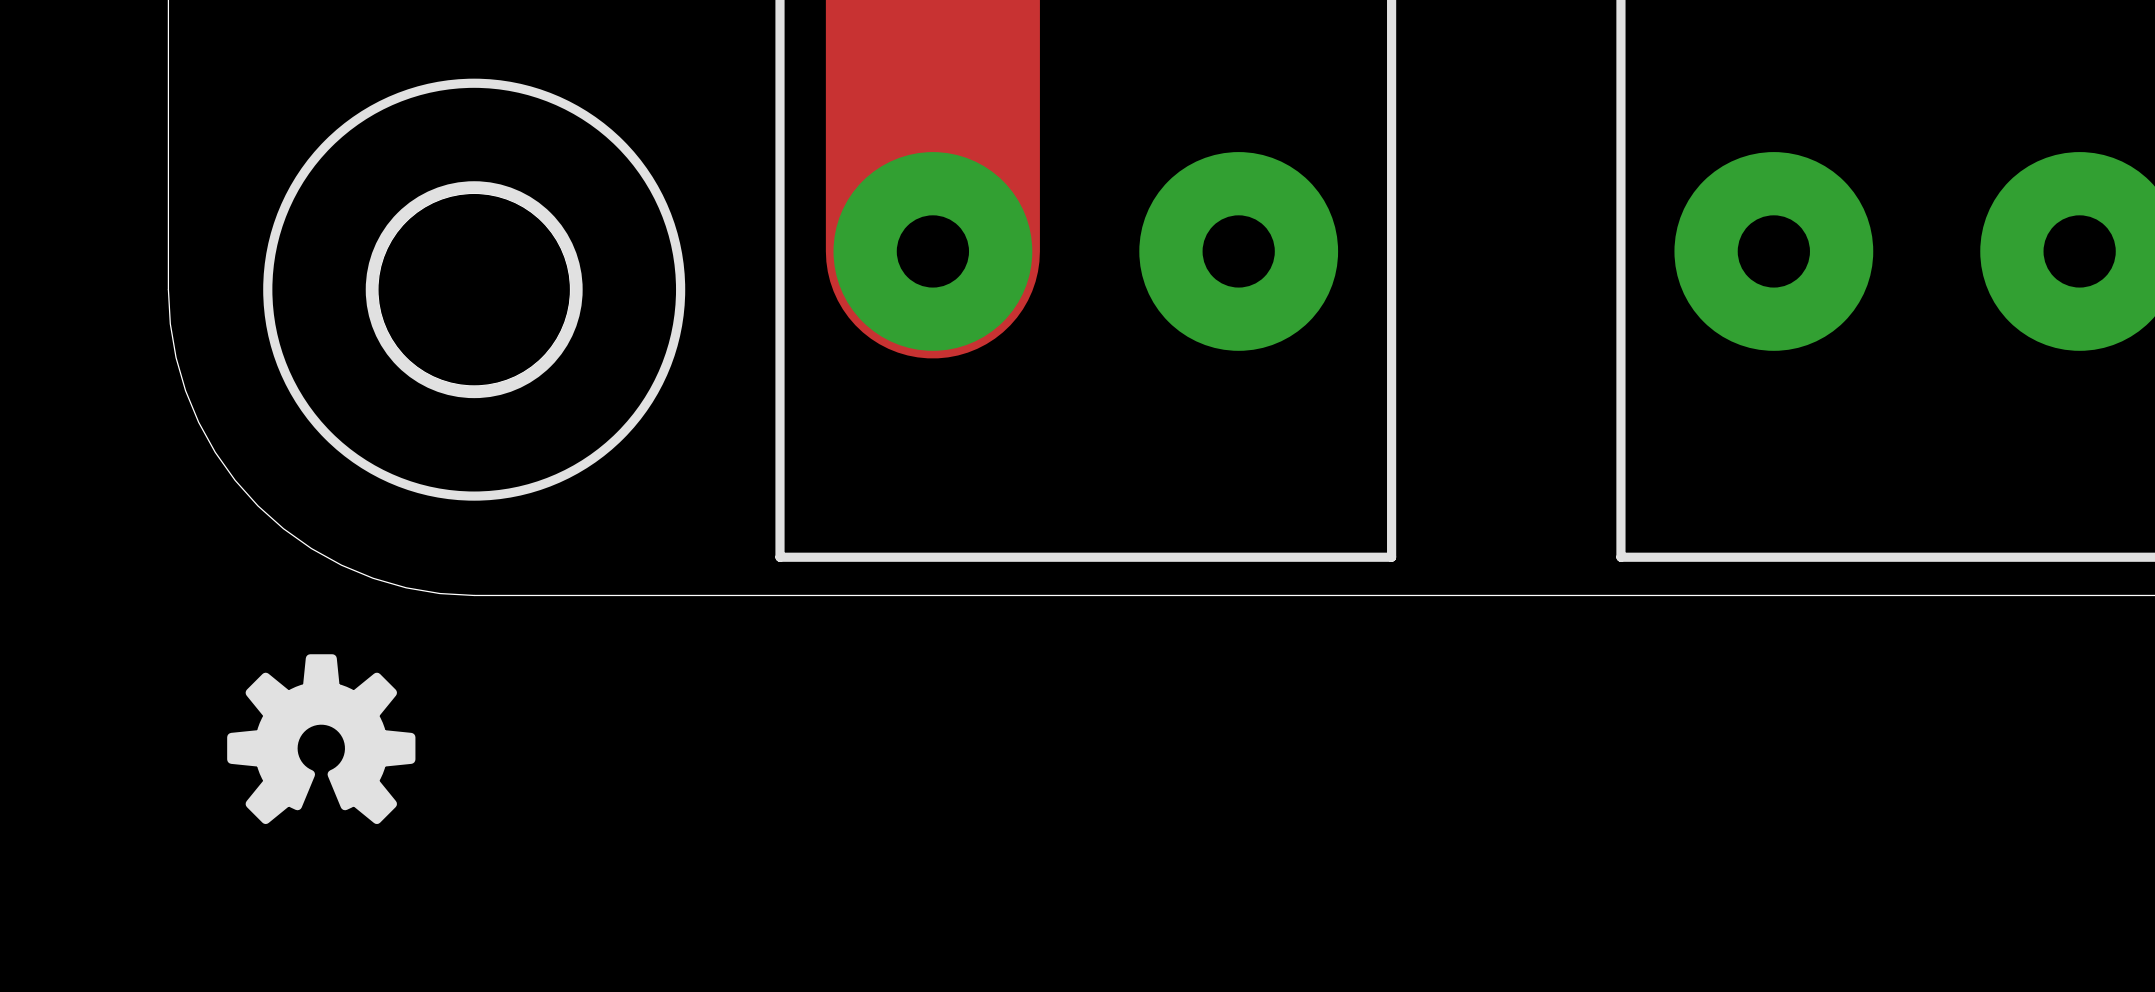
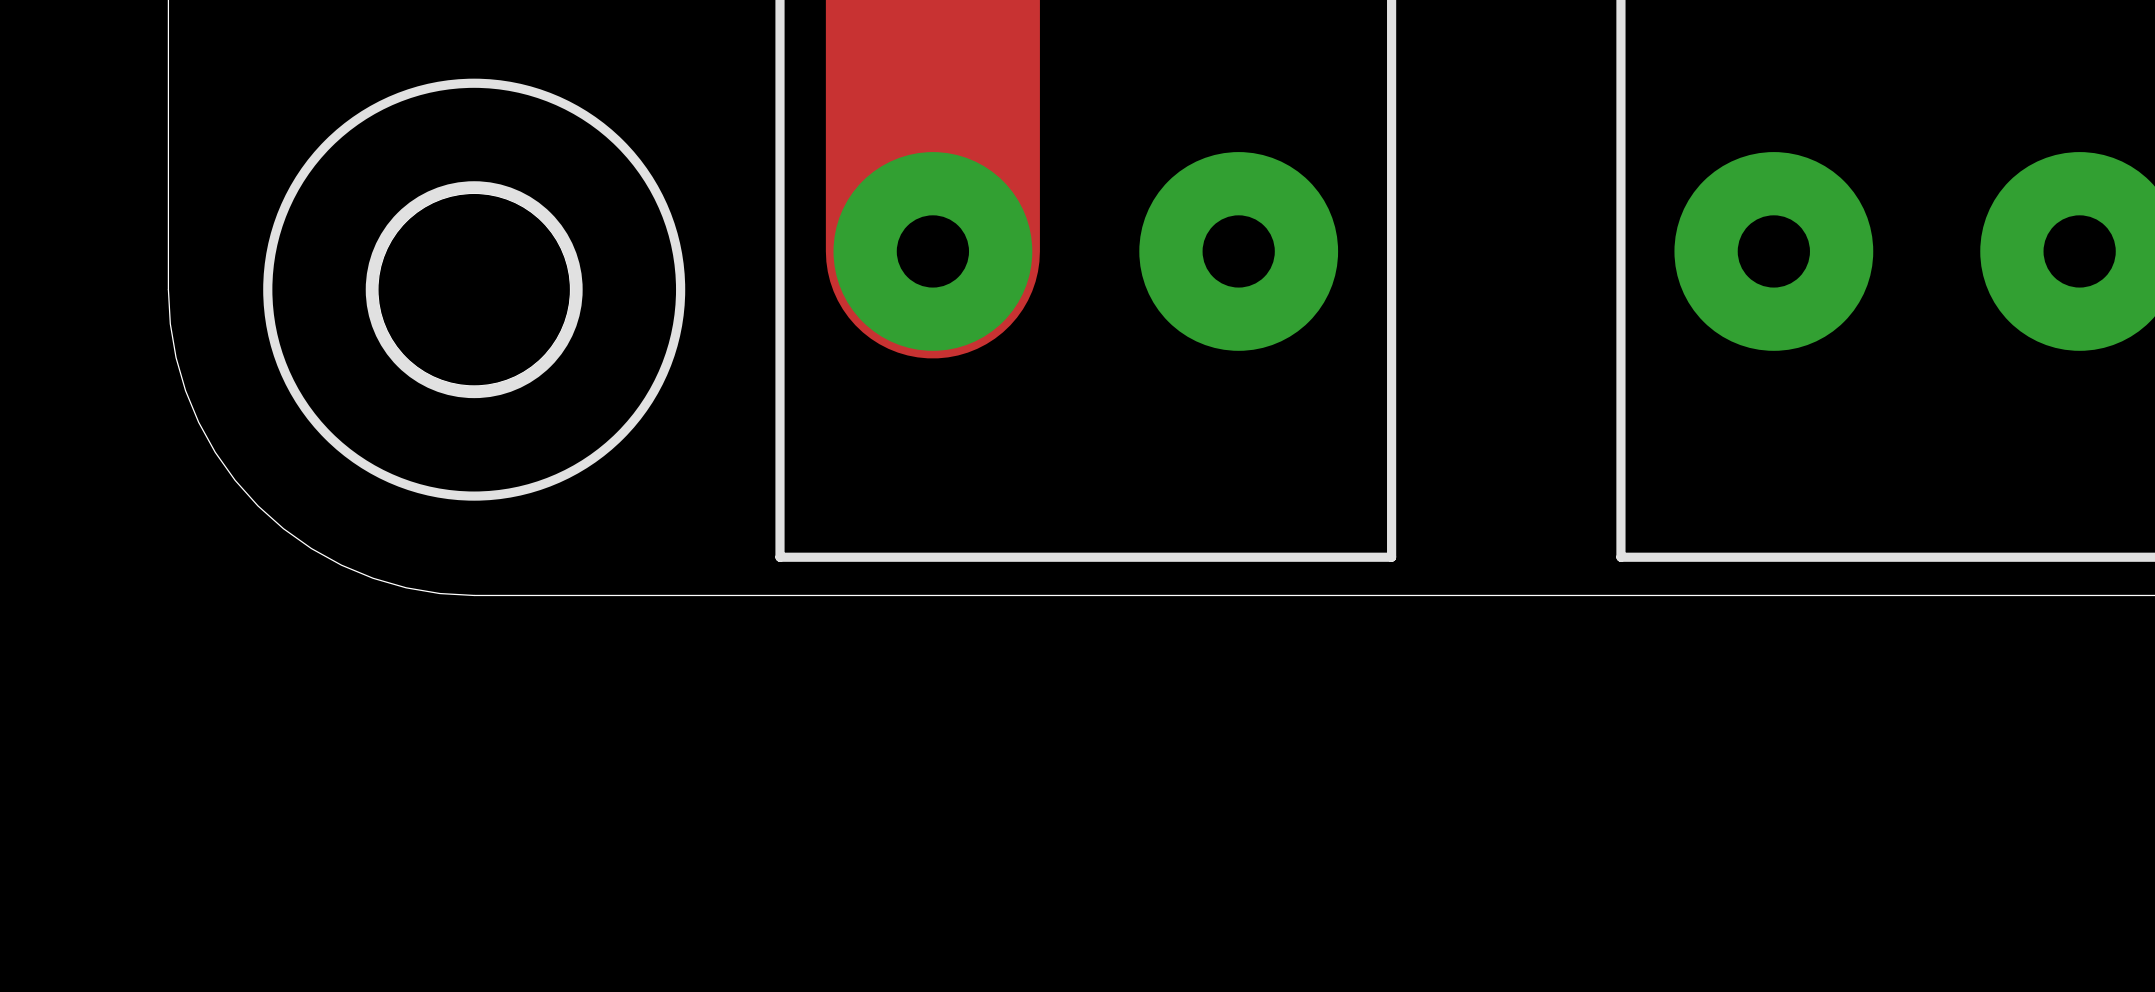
drawing: [227, 654, 416, 825] -> none

